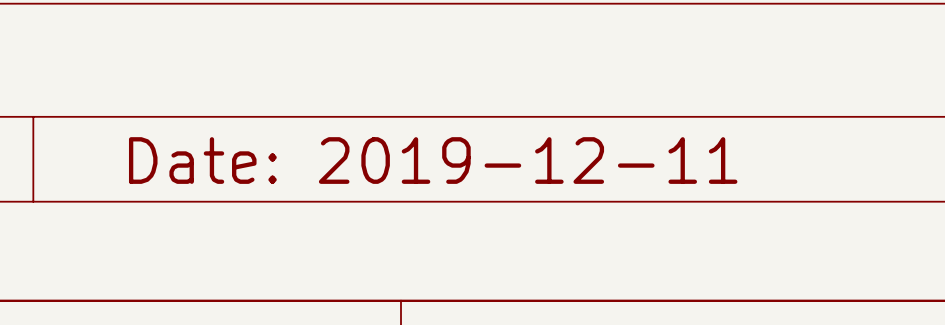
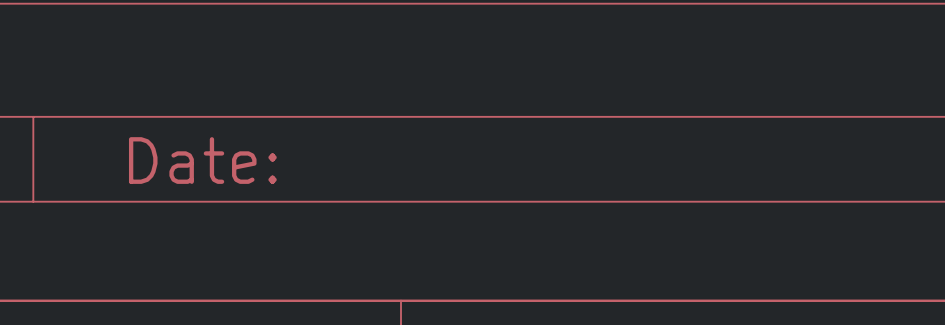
title block: Date: 2019-12-11 (433, 160) -> Date: (202, 160)

